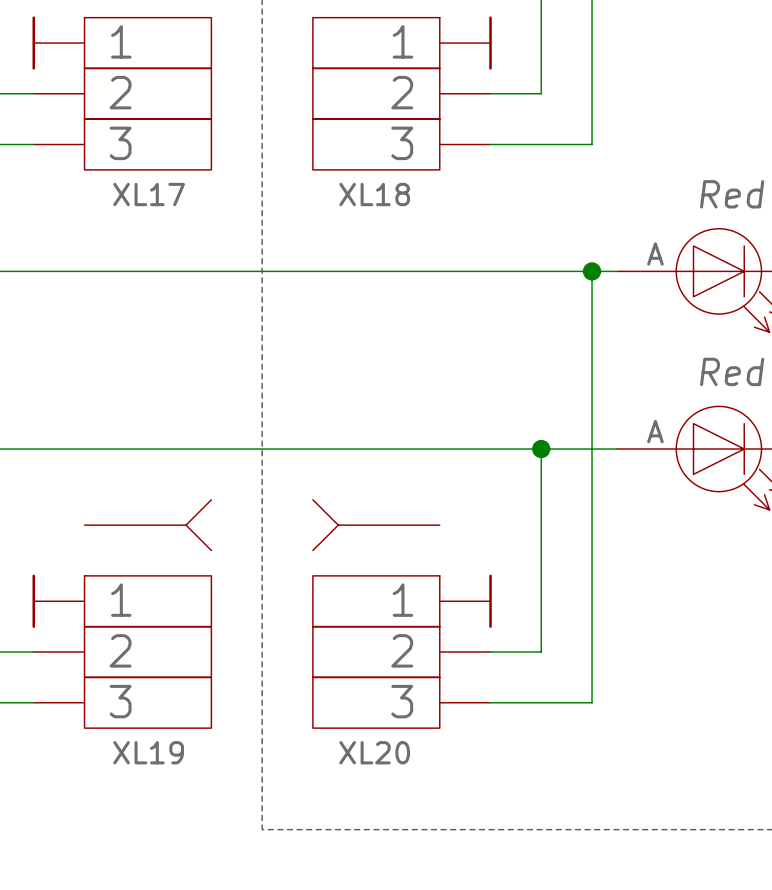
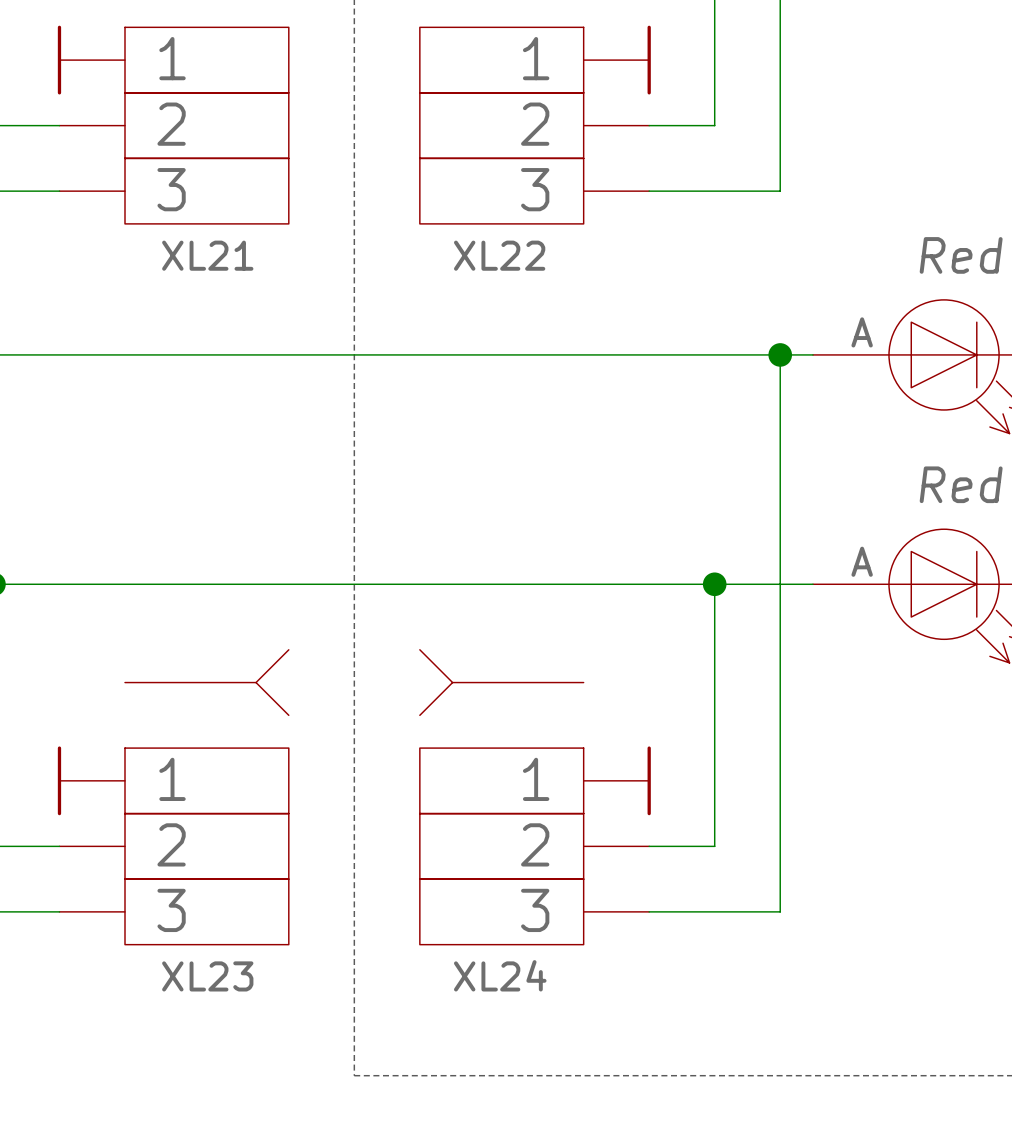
XL17 name: XL17 (149, 194) -> XL21 (207, 255)
XL18 name: XL18 (374, 194) -> XL22 (499, 255)
XL19 name: XL19 (148, 752) -> XL23 (207, 976)
XL20 name: XL20 (374, 752) -> XL24 (500, 975)

